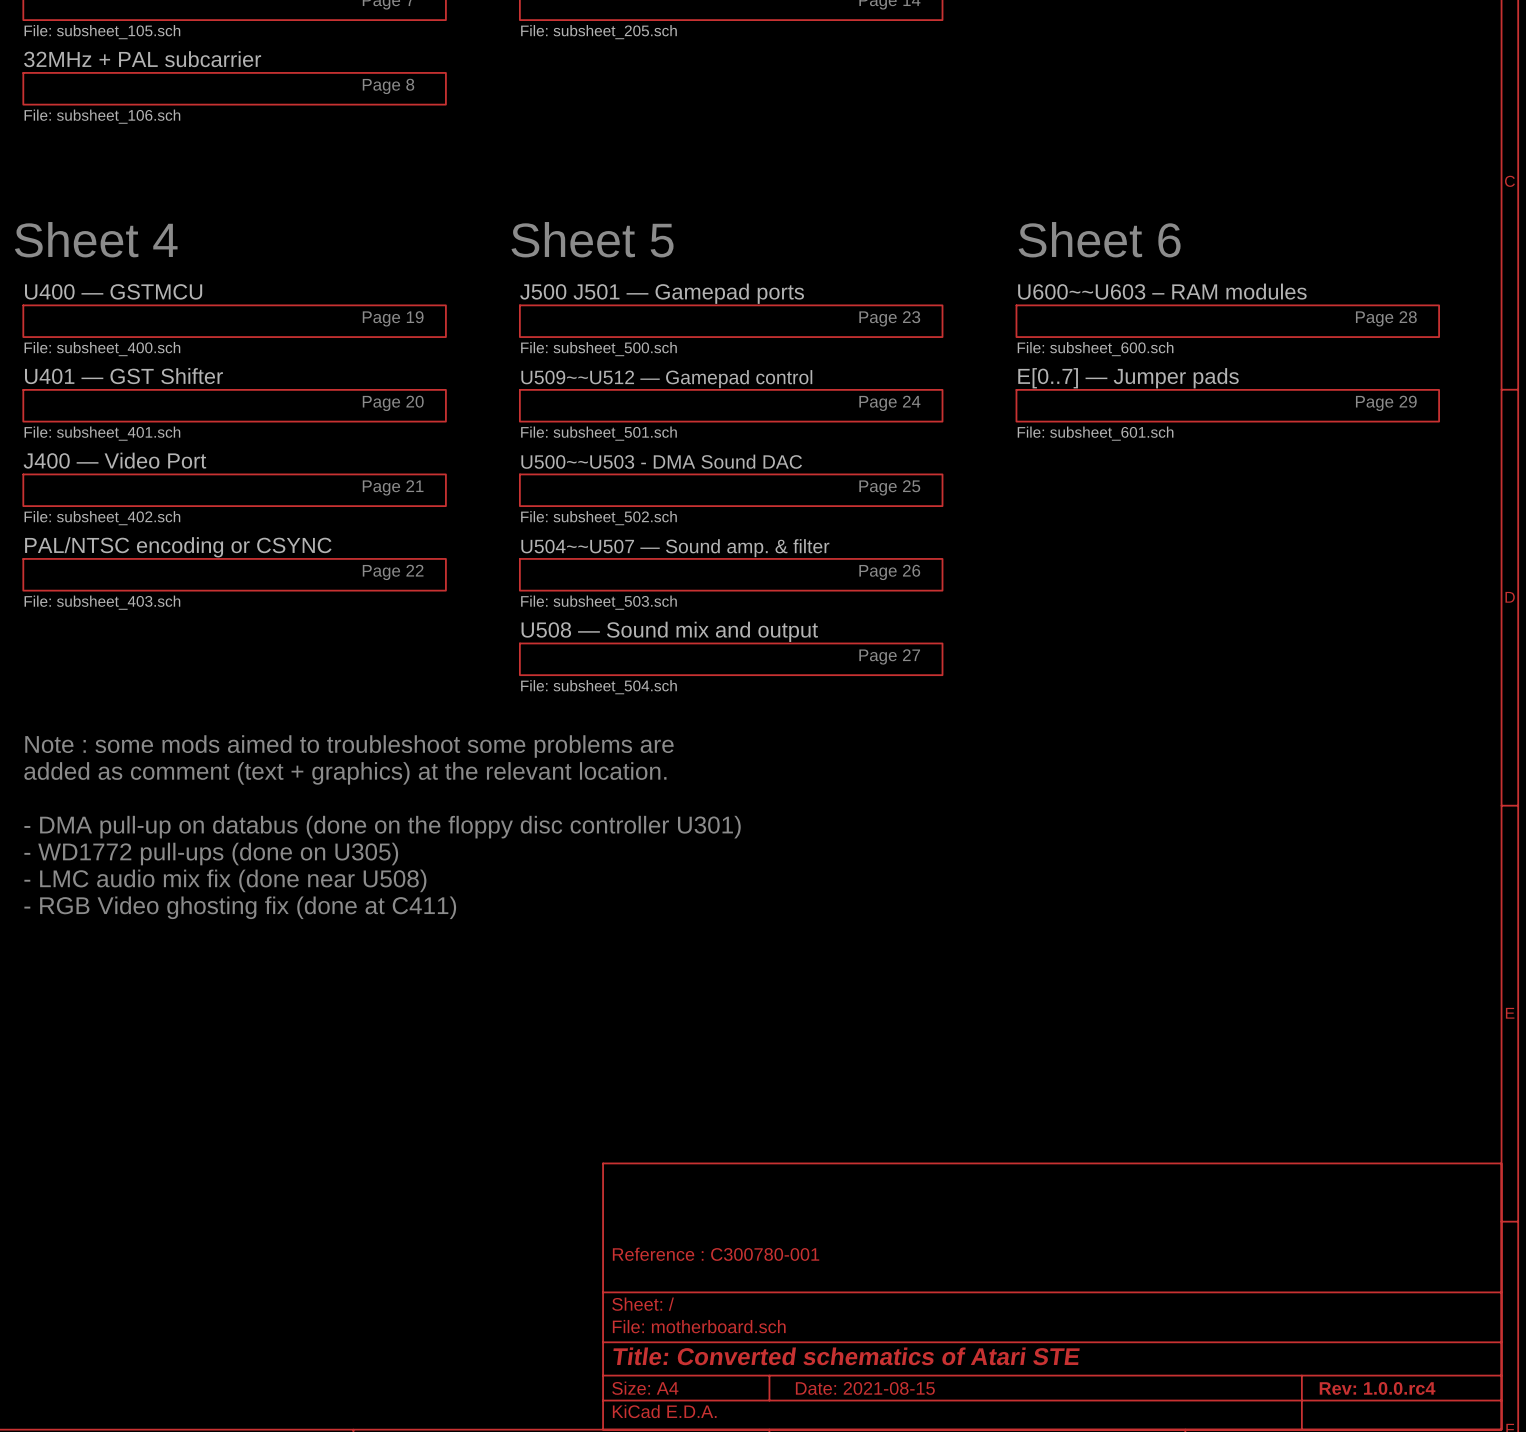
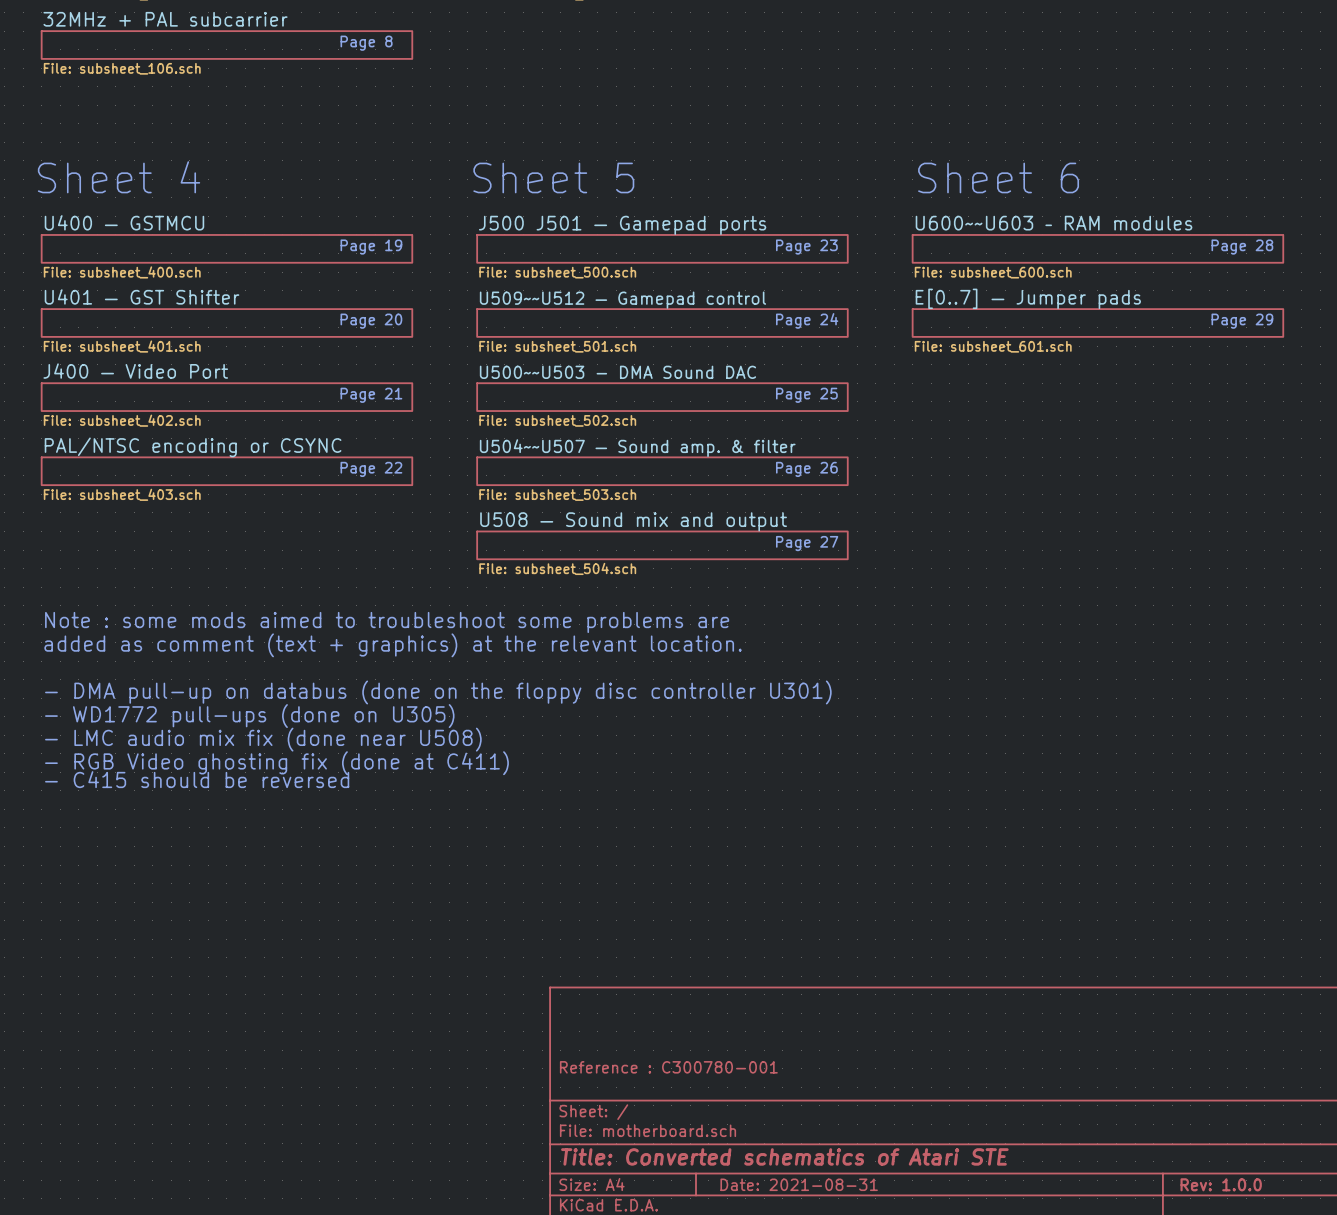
text: none -> - C415 should be reversed (197, 779)
title block: Date: 2021-08-15 (865, 1388) -> Date: 2021-08-31 (799, 1184)
title block: Rev: 1.0.0.rc4 (1377, 1388) -> Rev: 1.0.0 (1221, 1184)

